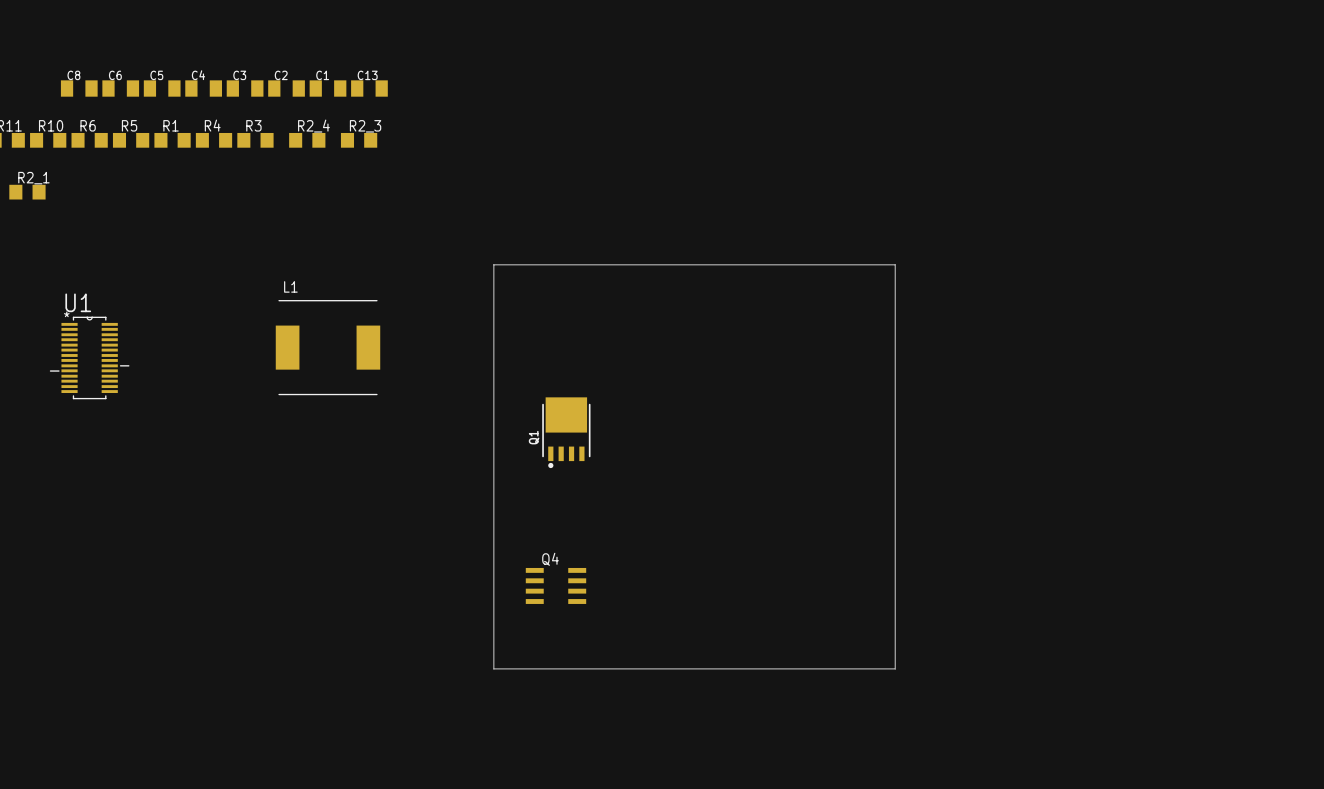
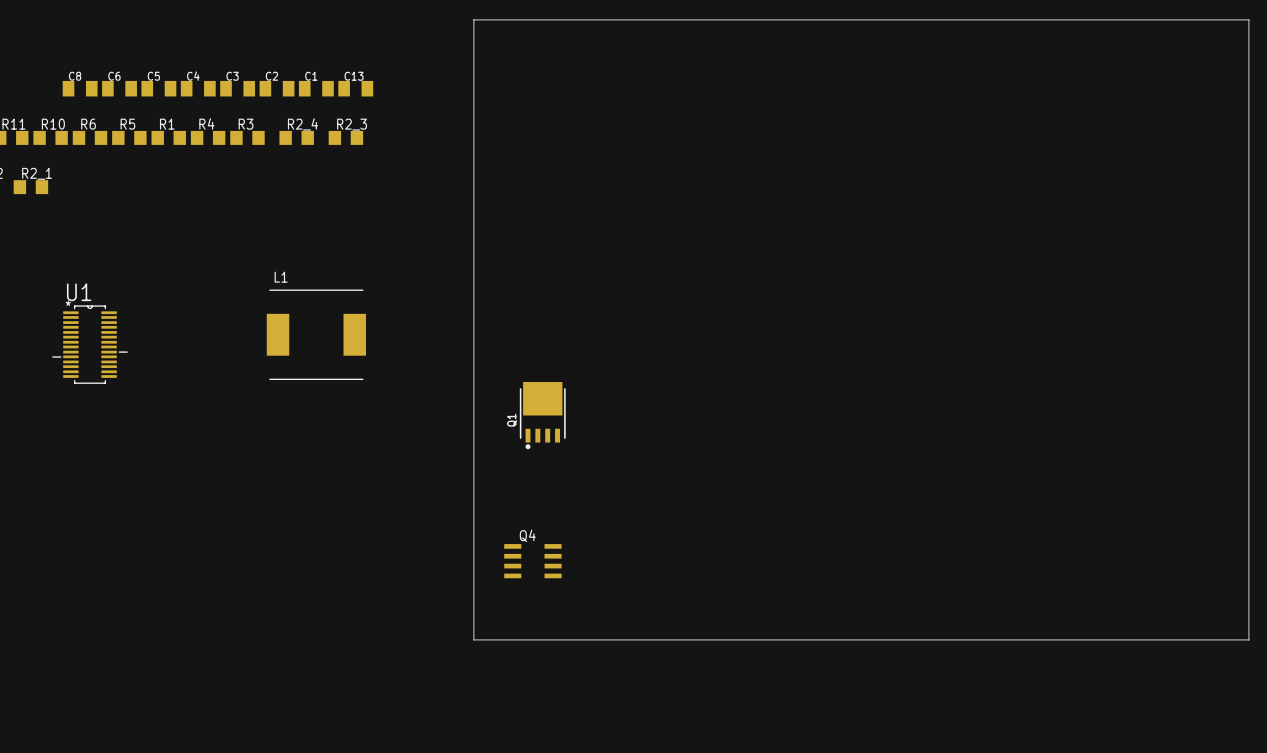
board edge: (493, 264) (895, 264) (895, 668) -> (473, 256) (473, 19) (1248, 19) (1248, 639) (855, 639)

